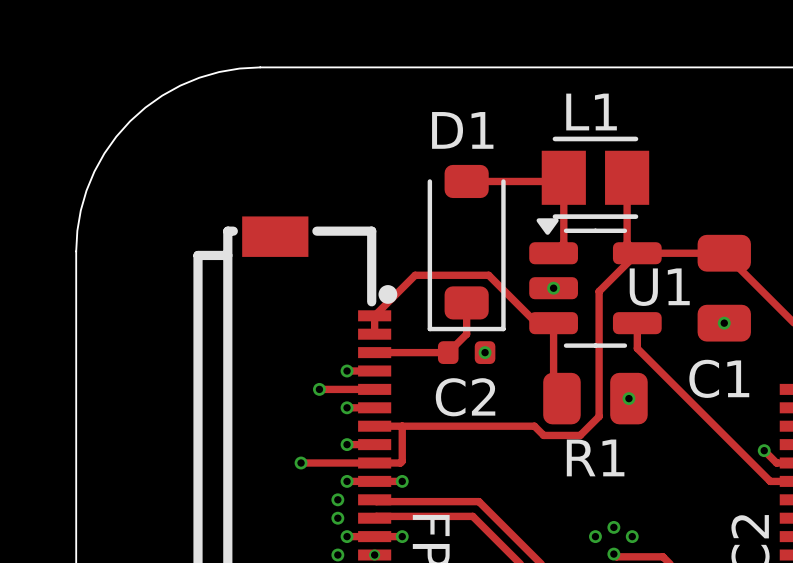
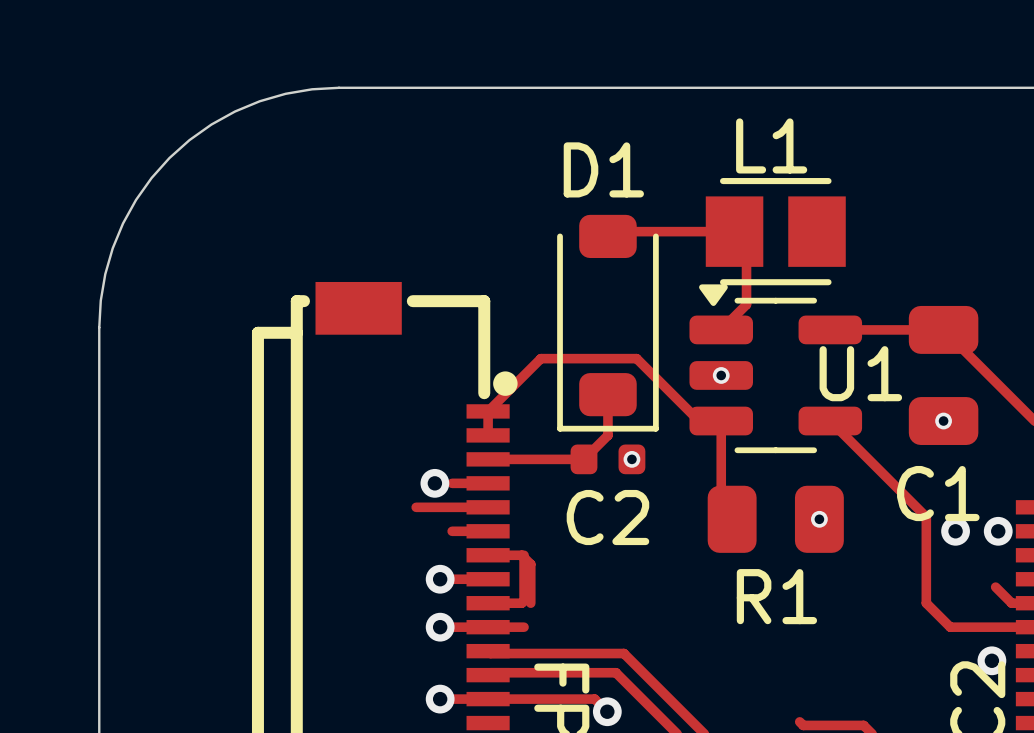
track: (627, 177) (627, 243) (637, 253) (599, 291) (599, 416) (580, 435) (543, 435) (534, 426) (400, 426) -> (530, 603) (530, 564) (521, 555)
track: (466, 181) (560, 181) (563, 177) (563, 243) -> (627, 231) (746, 231) (746, 304) (734, 316)
track: (637, 323) (637, 348) (770, 481) -> (830, 421) (926, 517) (926, 603) (950, 627) (1003, 627)
via size: [340, 364, 354, 378] -> [420, 468, 450, 498]
via: (319, 389) -> none
via: (347, 407) -> none
via: none -> (955, 531)
via: none -> (998, 531)
via size: [340, 438, 354, 452] -> [425, 564, 455, 594]
via: (764, 450) -> none
track: (301, 463) (370, 463) -> none
via: (301, 463) -> none
via size: [340, 474, 354, 488] -> [425, 612, 455, 642]
via: (402, 481) -> none
via: (337, 499) -> none
via: none -> (991, 660)
via: (337, 518) -> none
via: (613, 527) -> none
via size: [340, 530, 354, 544] -> [425, 684, 455, 714]
track: none -> (524, 699) (594, 699) (607, 711)
via: (402, 536) -> none
via: (595, 536) -> none
via: (632, 536) -> none
via: none -> (607, 711)
via: (613, 554) -> none
via: (337, 555) -> none
via: (374, 555) -> none

